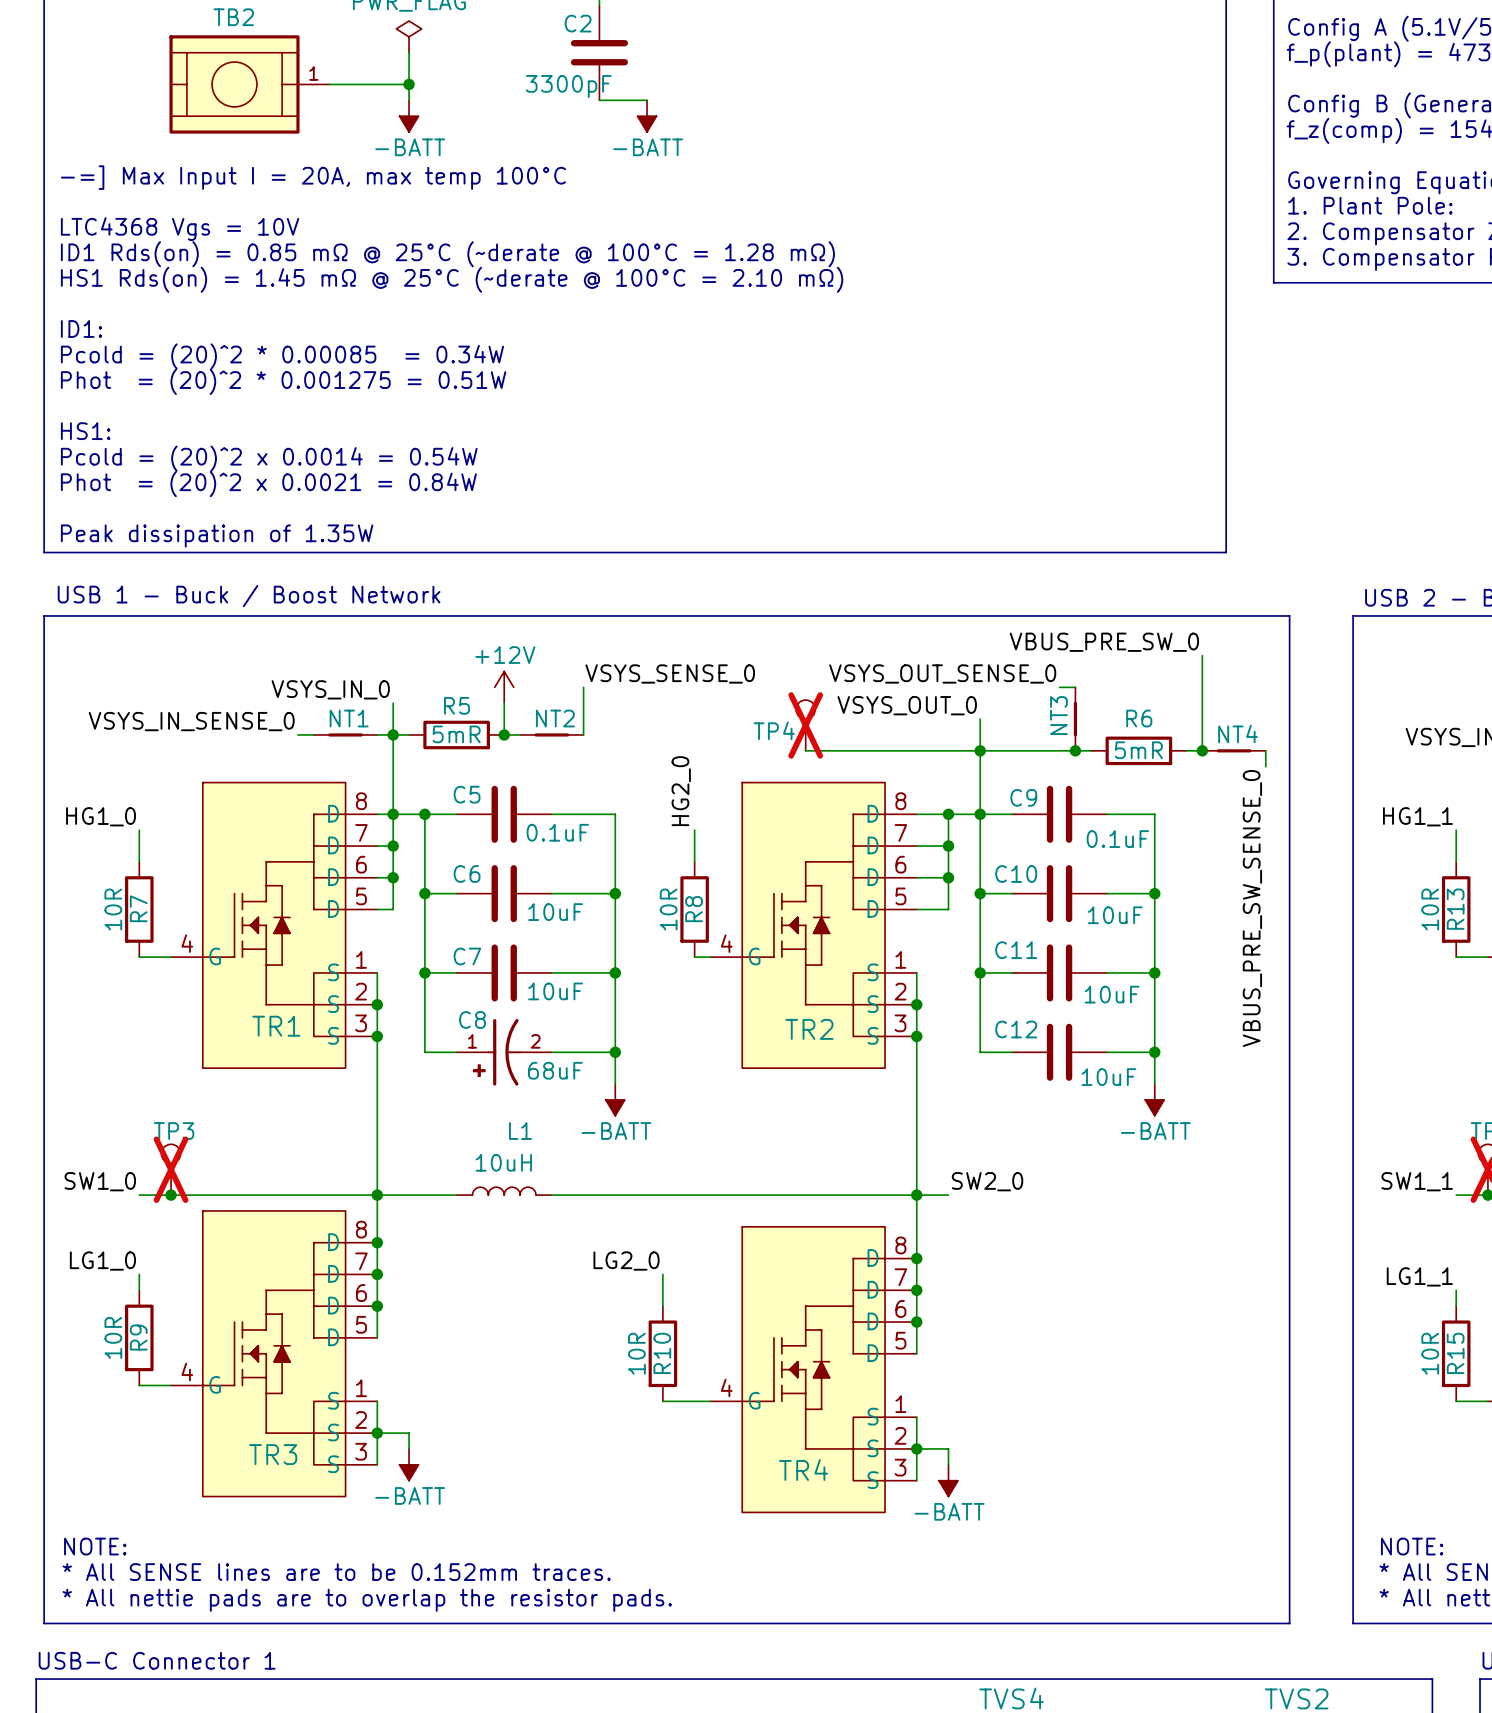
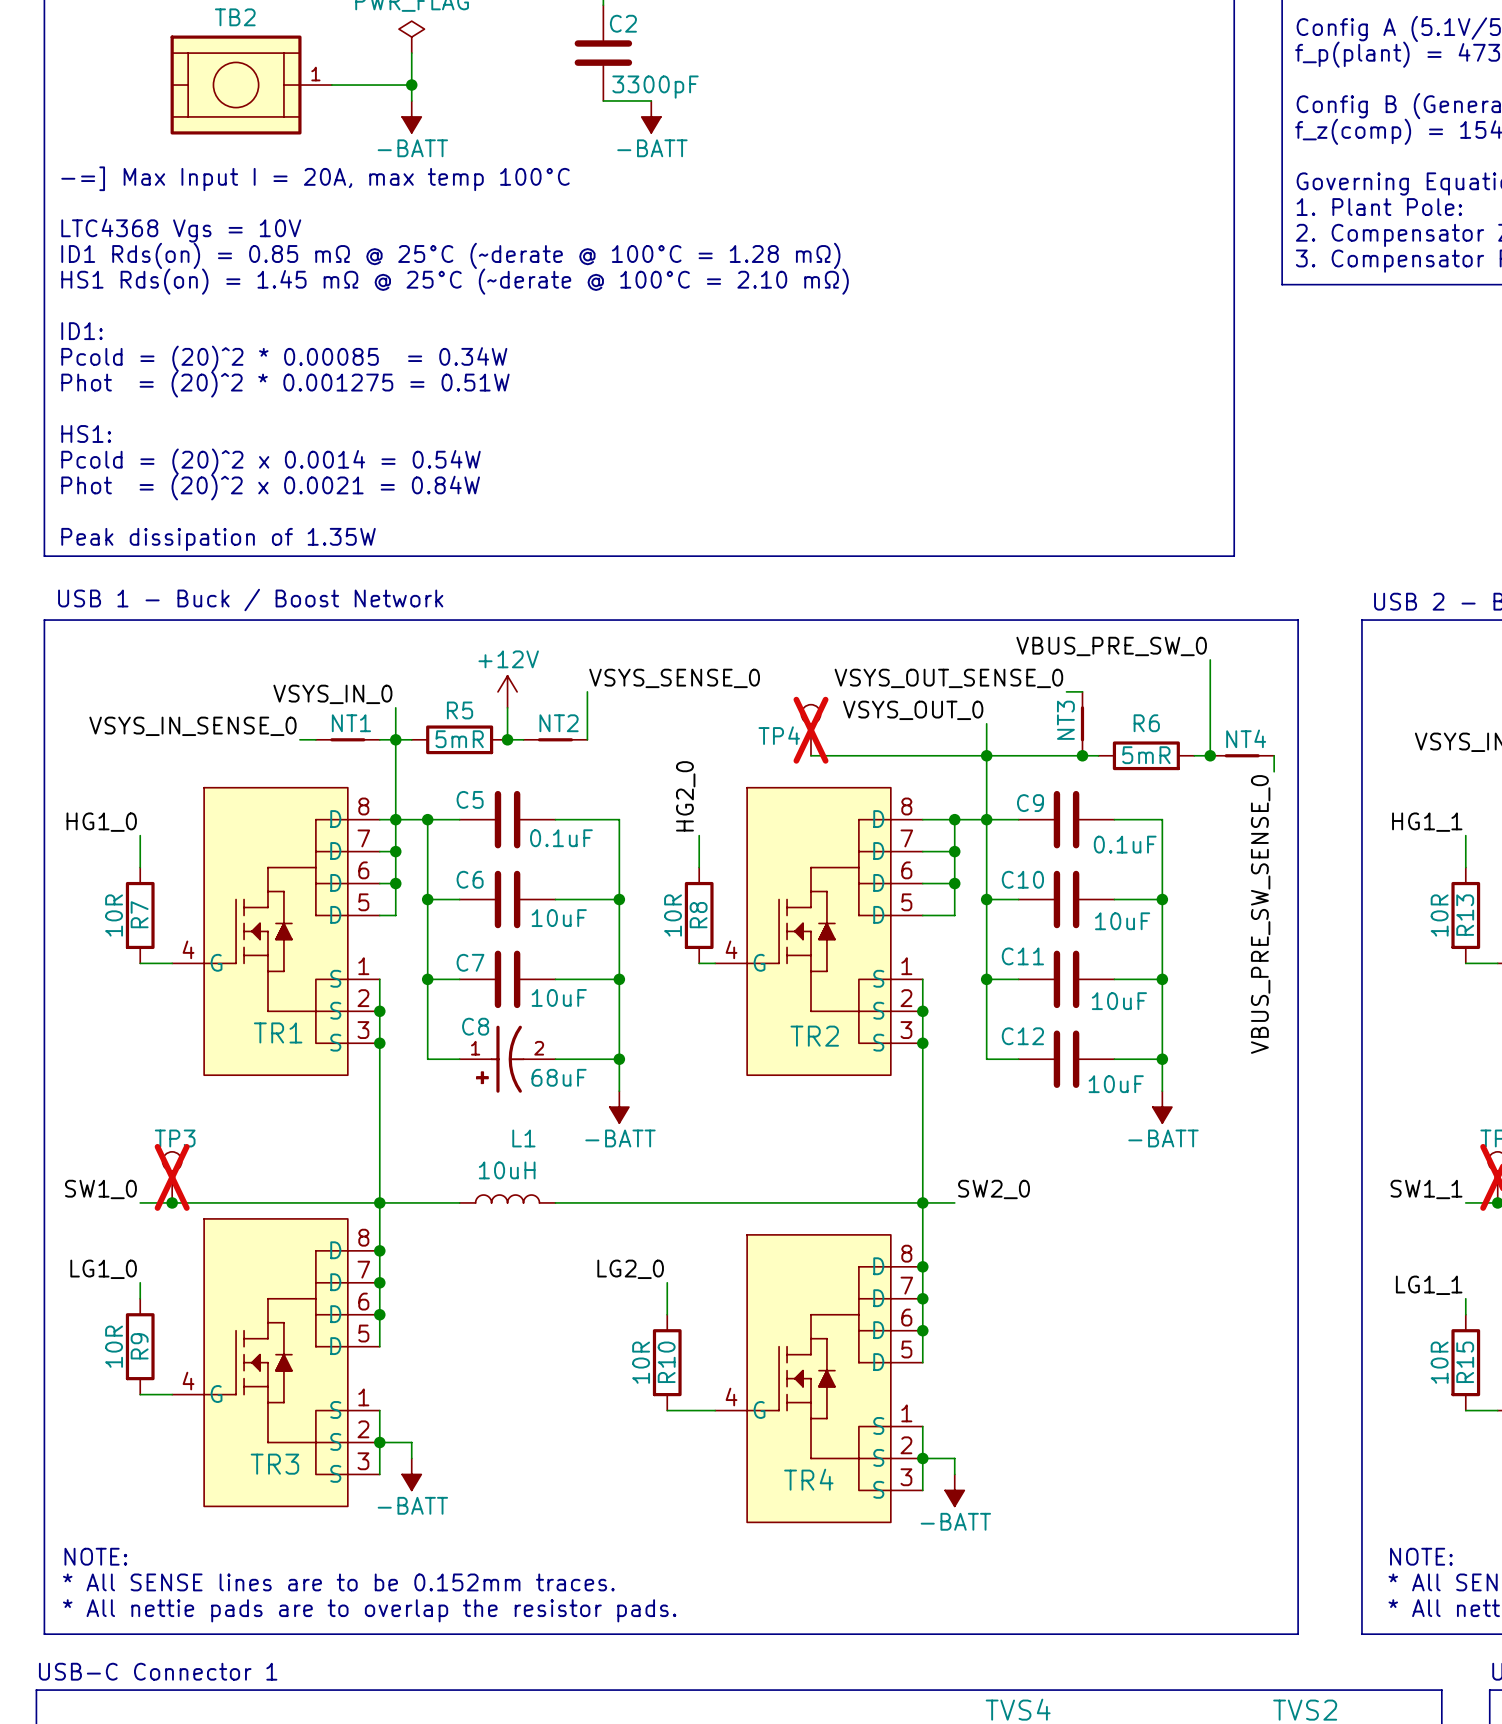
C2 name position: C2 (578, 23) -> C2 (623, 23)
C2 value position: 3300pF (568, 86) -> 3300pF (655, 87)

